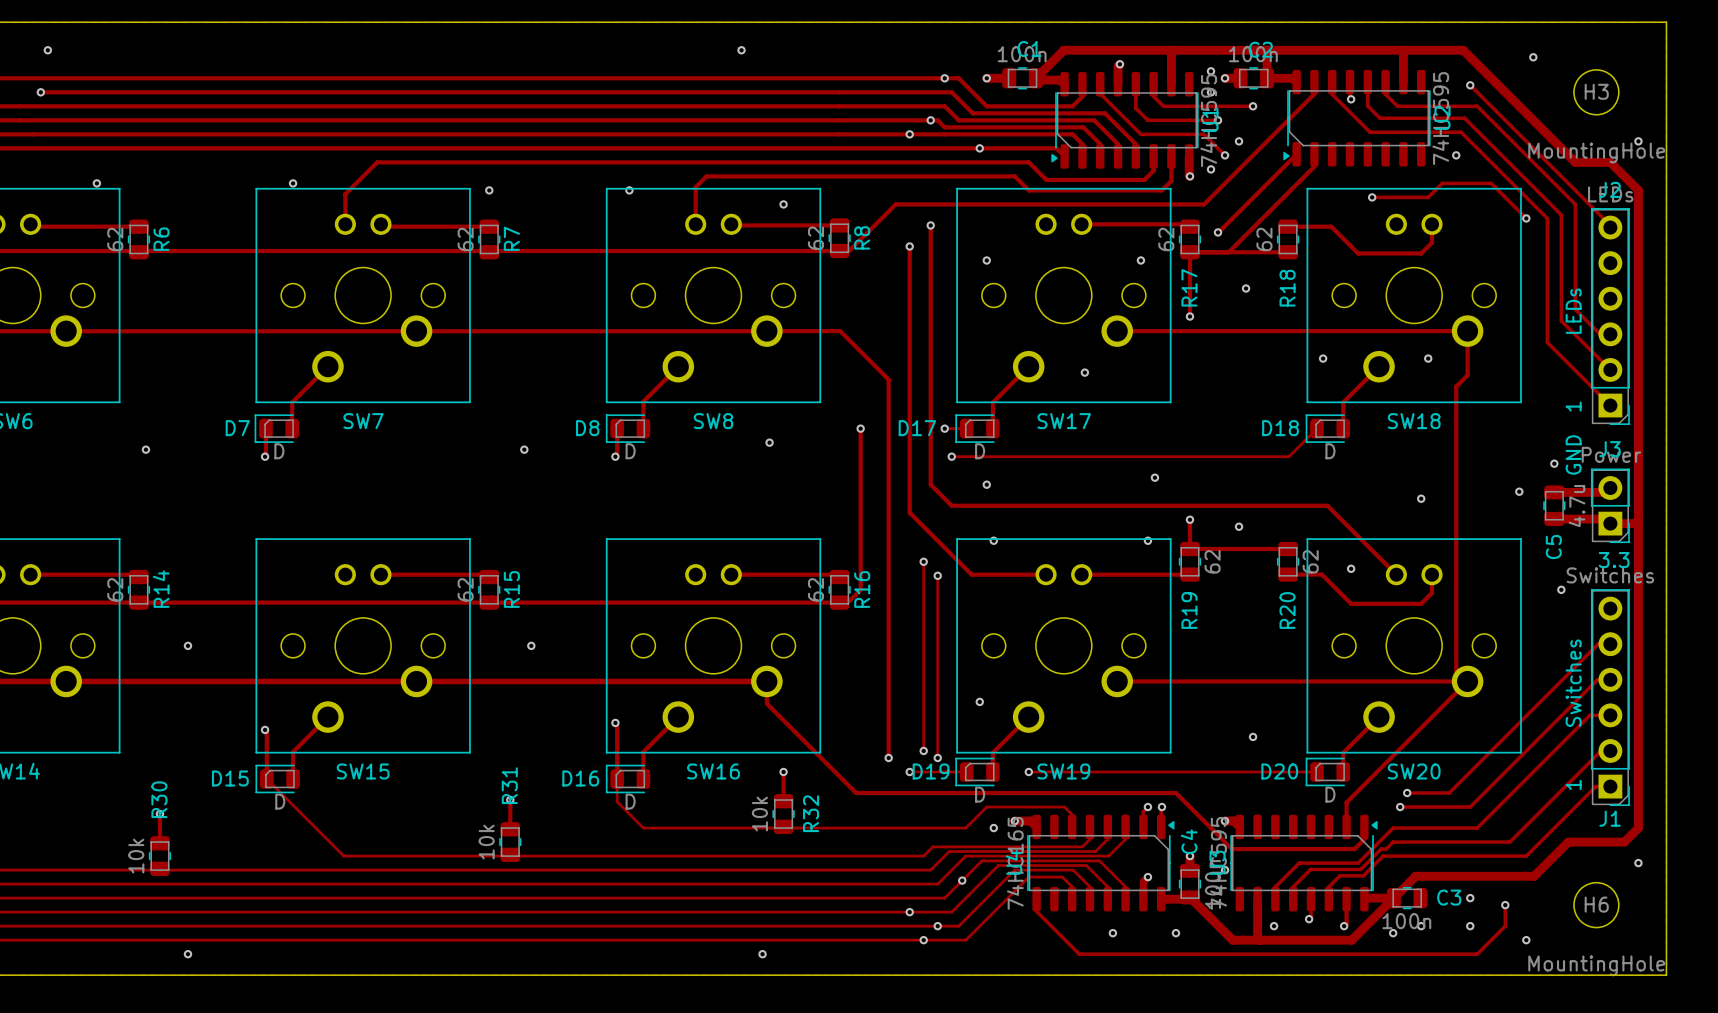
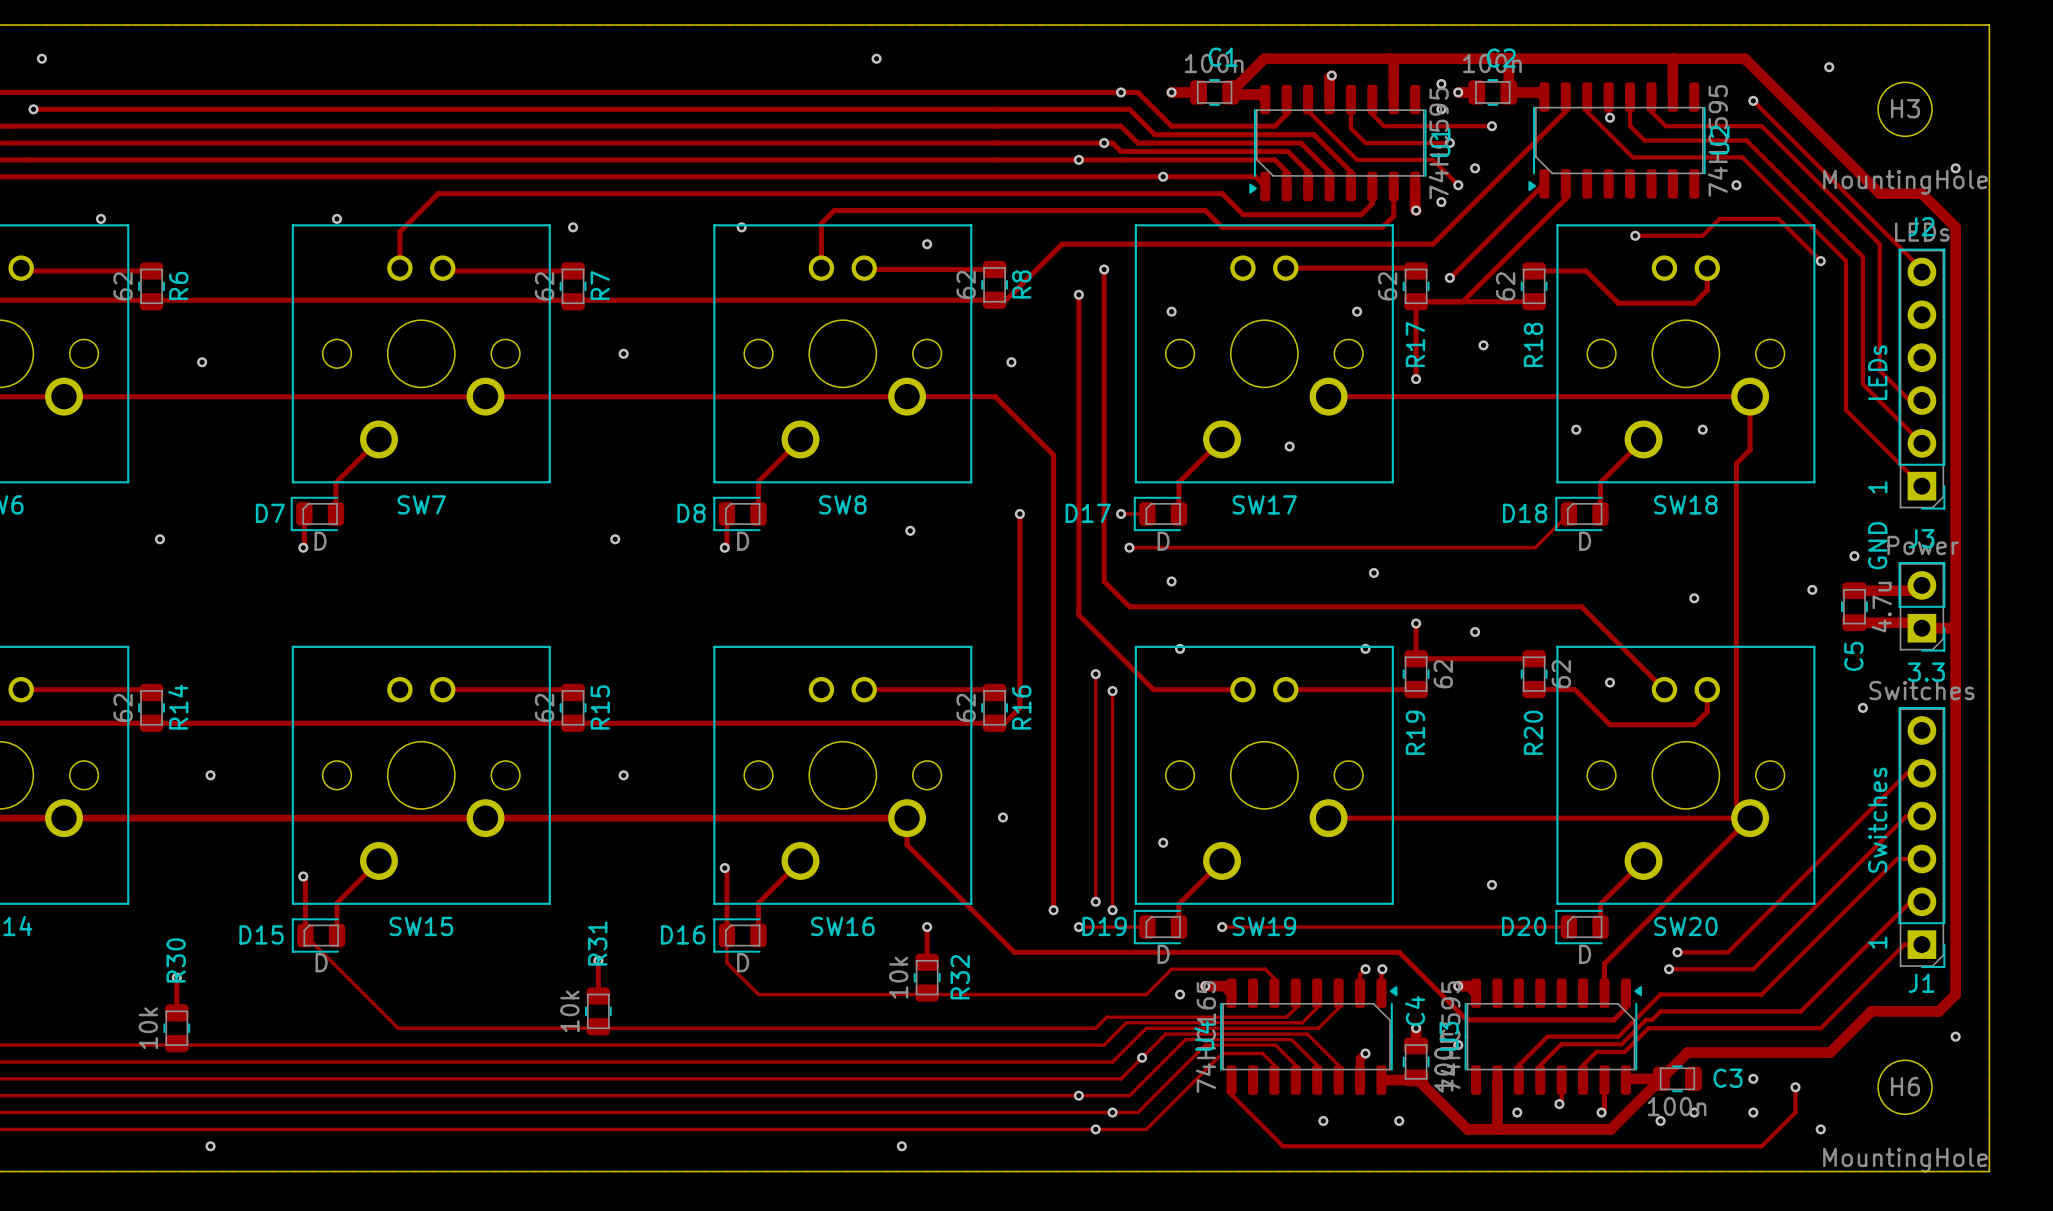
via: none -> (623, 353)
via: none -> (202, 362)
via: none -> (1011, 362)
via: none -> (1003, 817)

